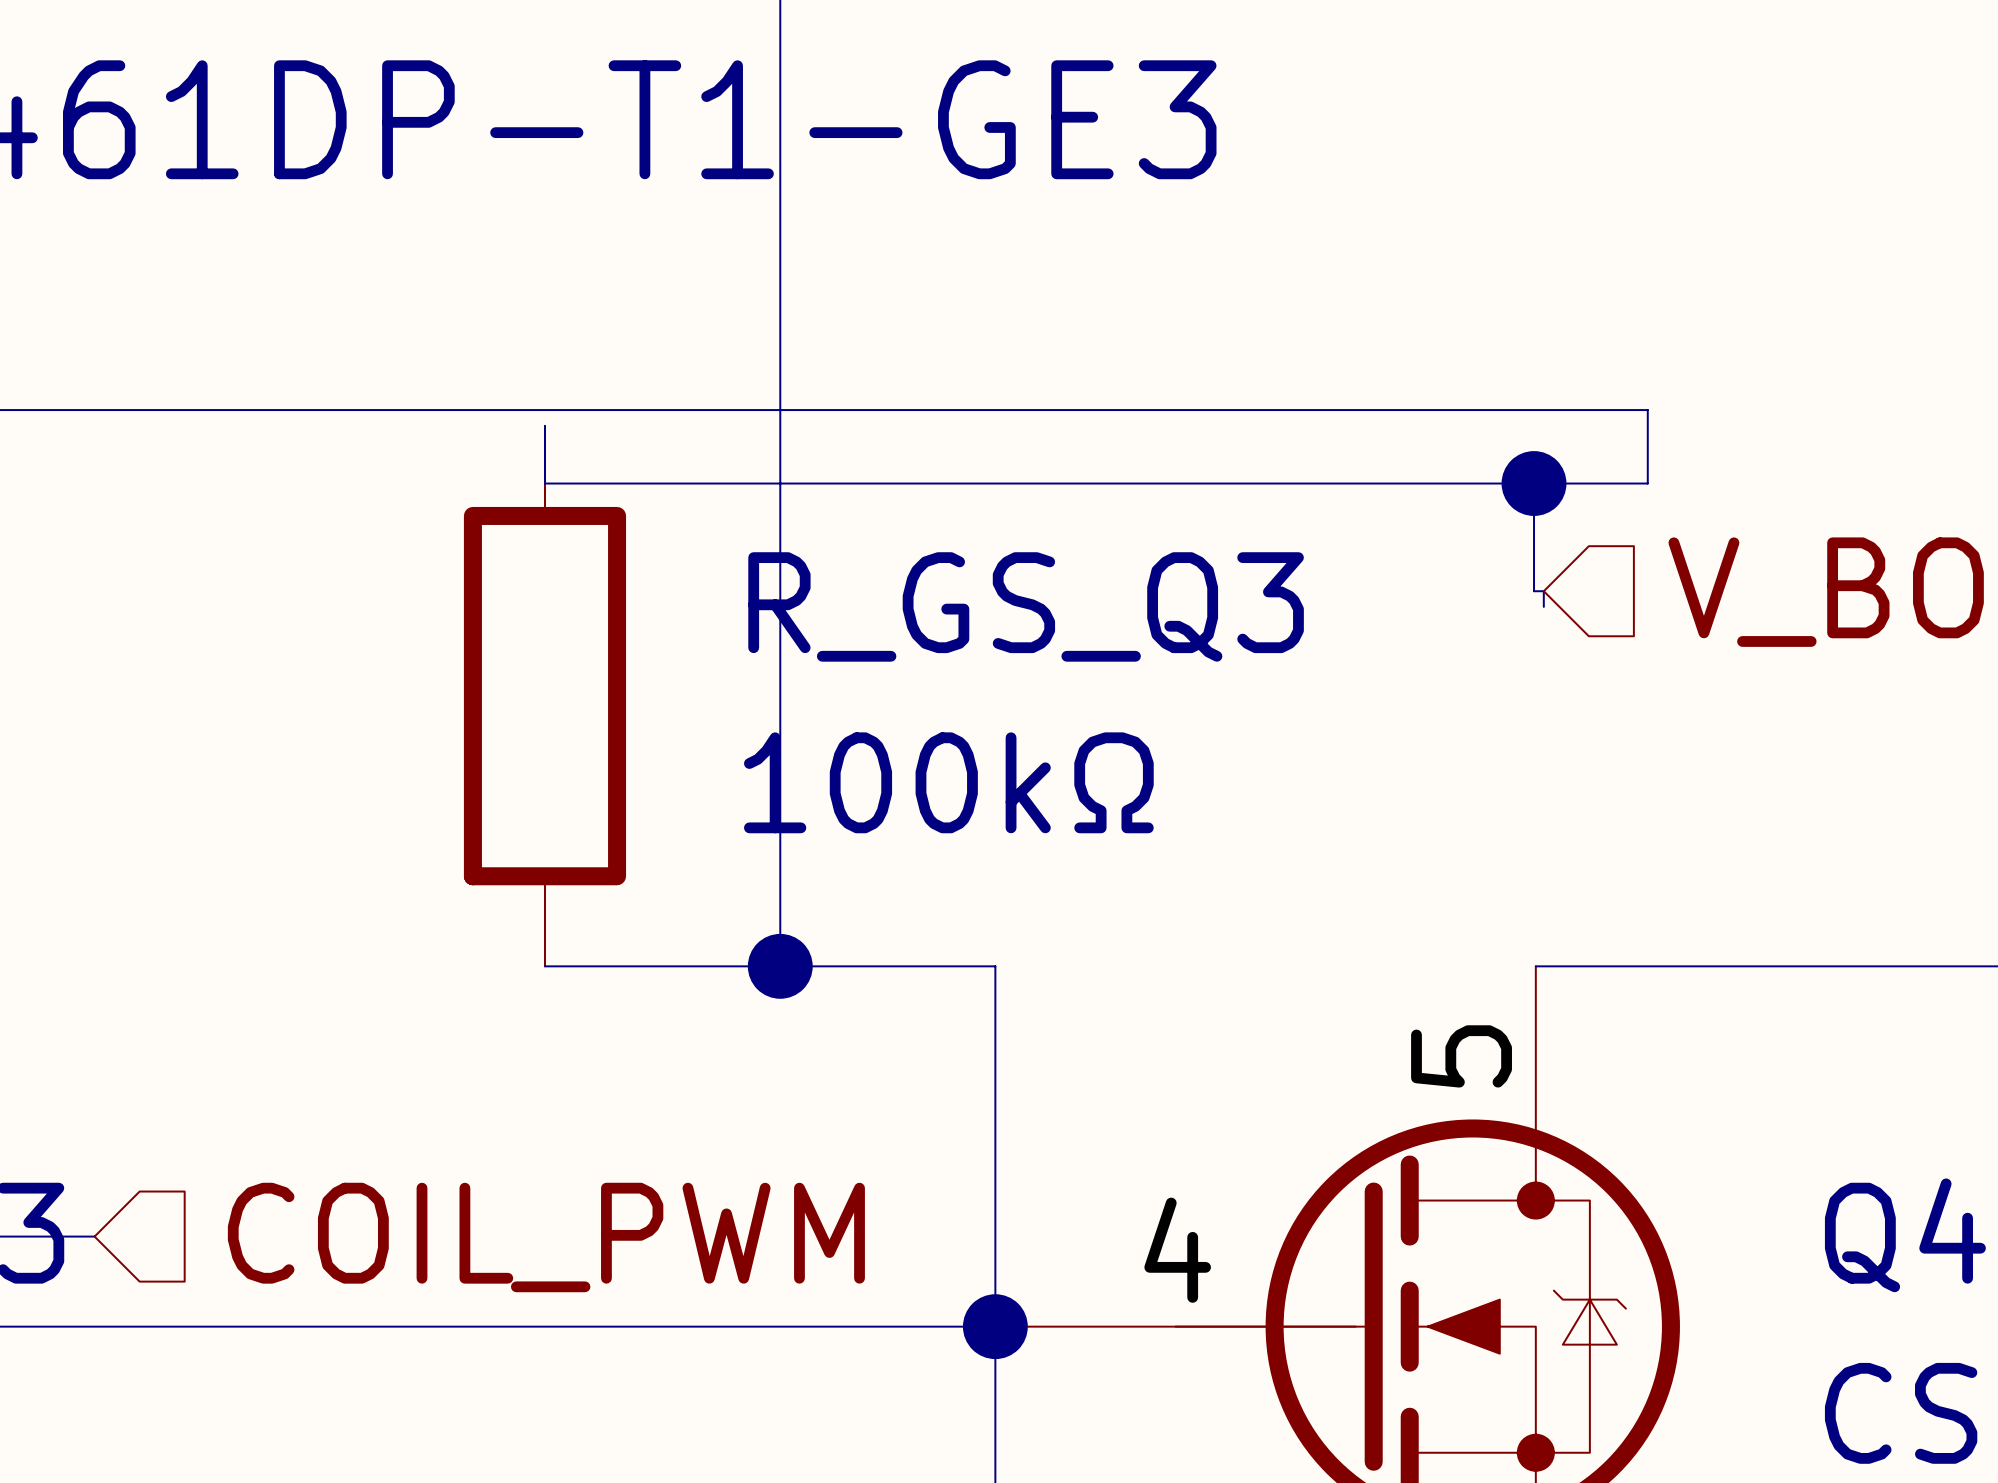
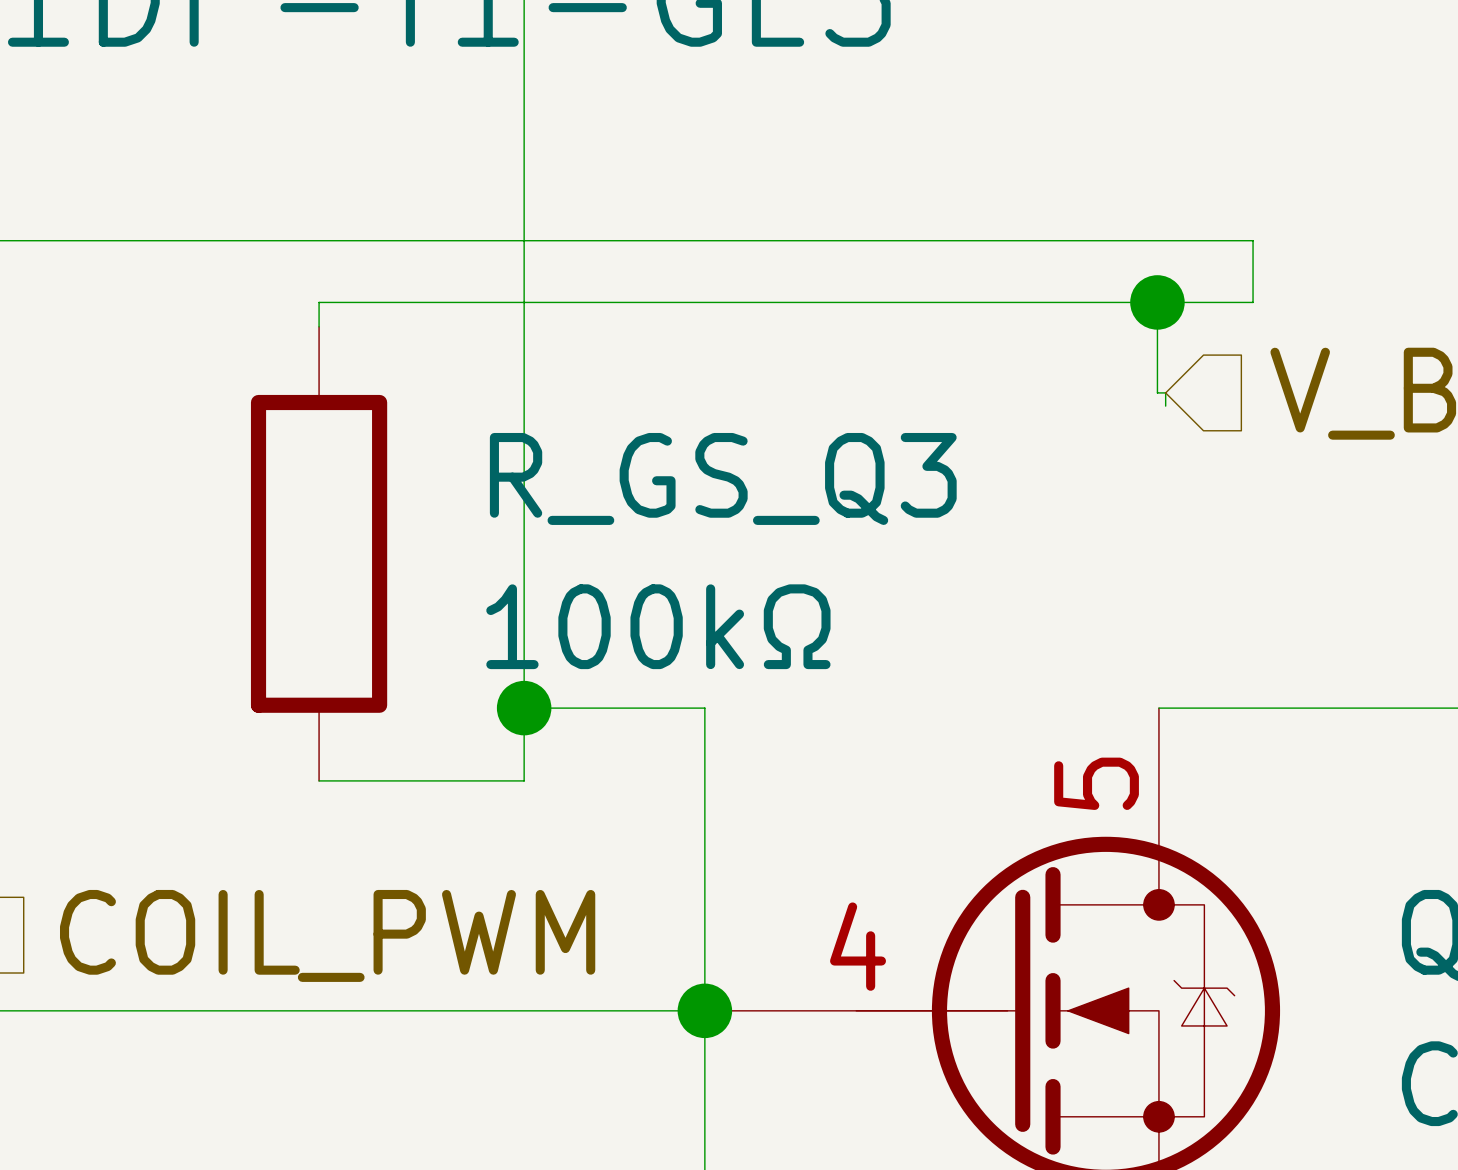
wire: (544, 425) (544, 483) -> (319, 326) (319, 302) (326, 302)
R_GS_Q3 position: (544, 696) -> (319, 553)
wire: (544, 966) (780, 966) -> none
wire: none -> (524, 711) (524, 780) (319, 780)

